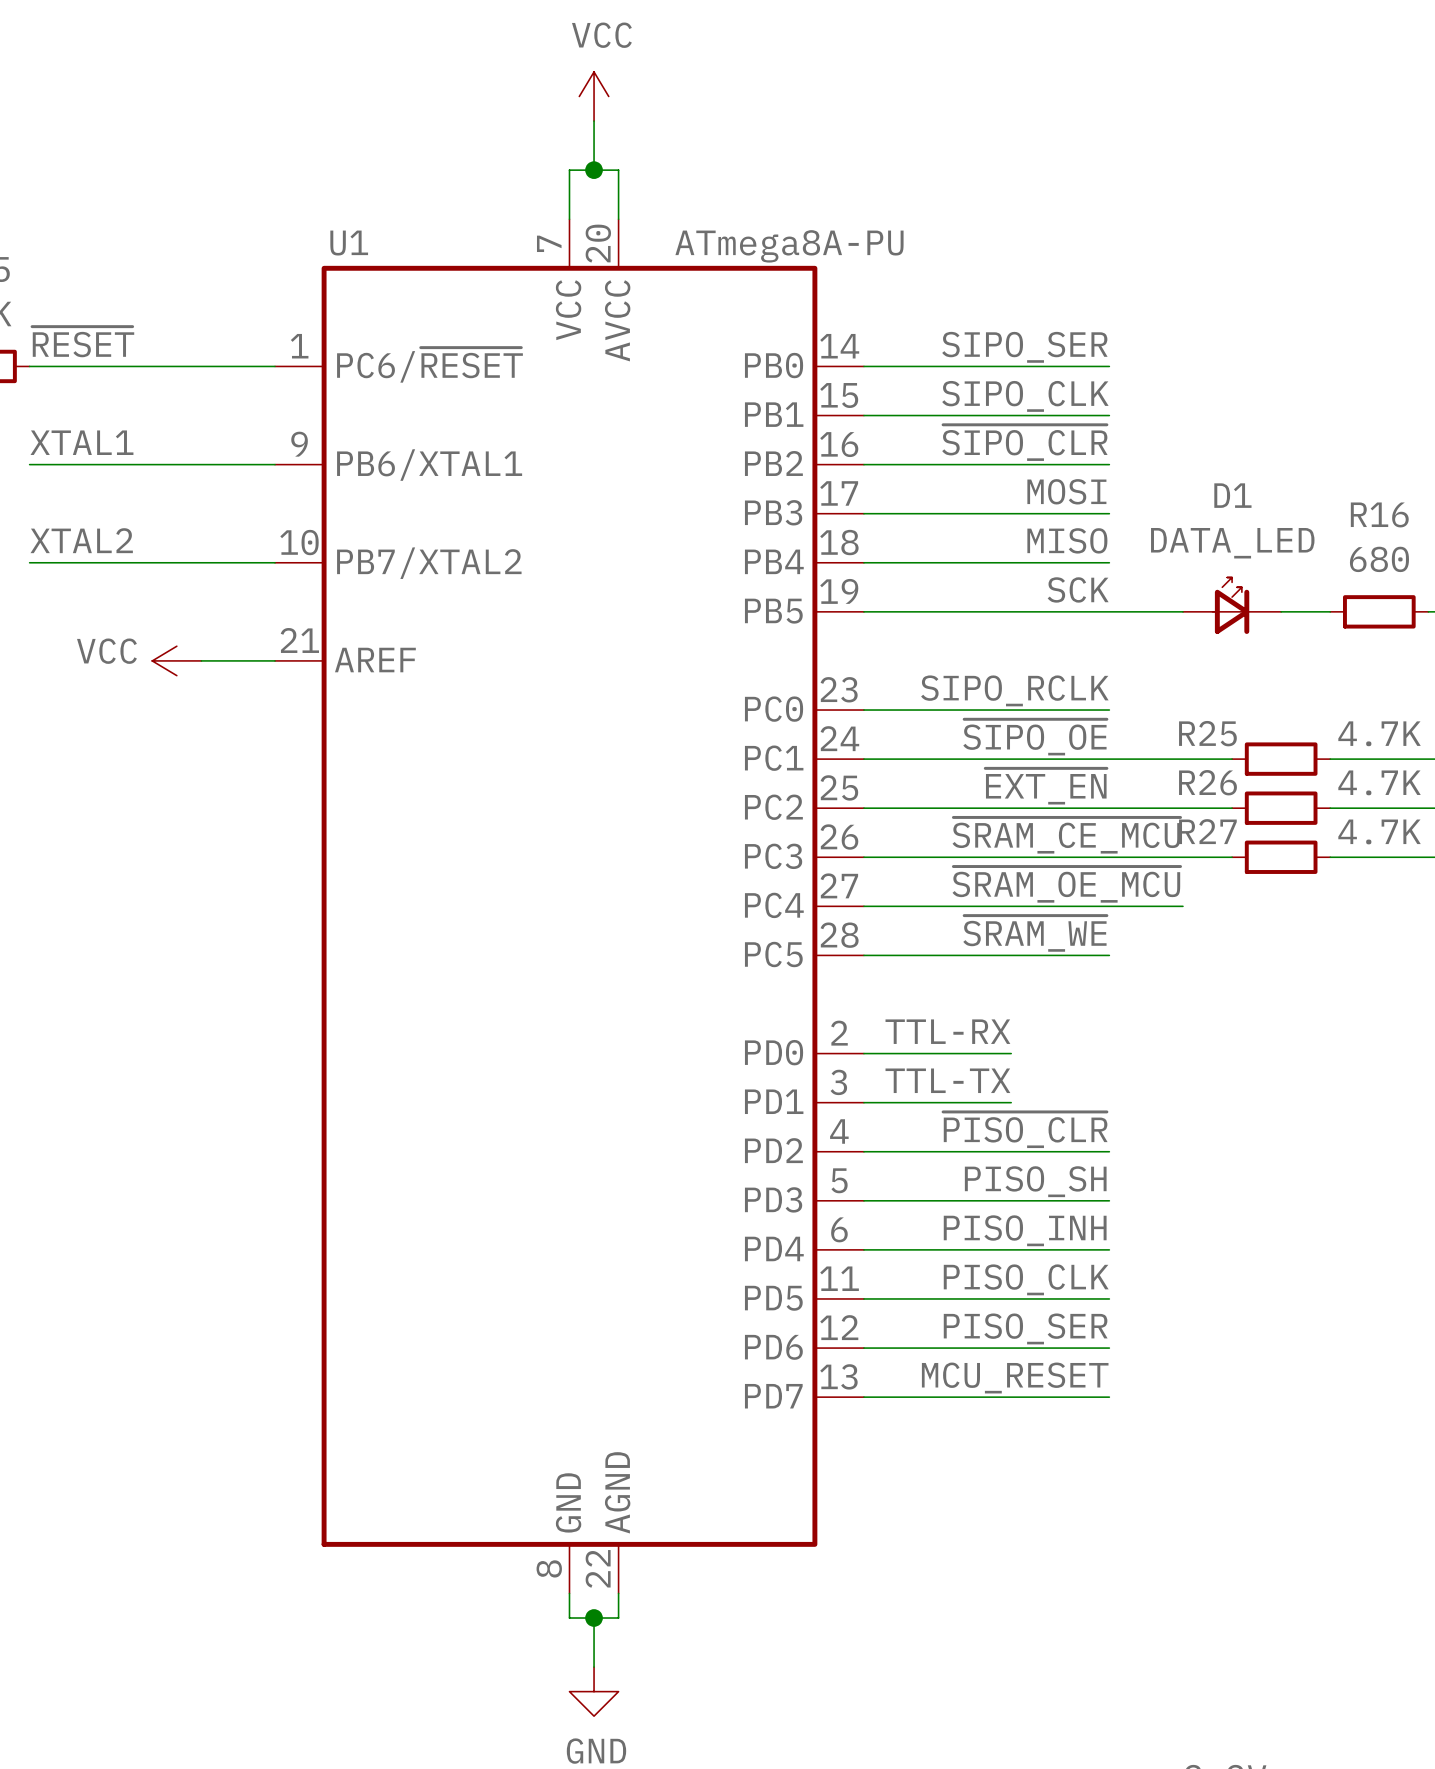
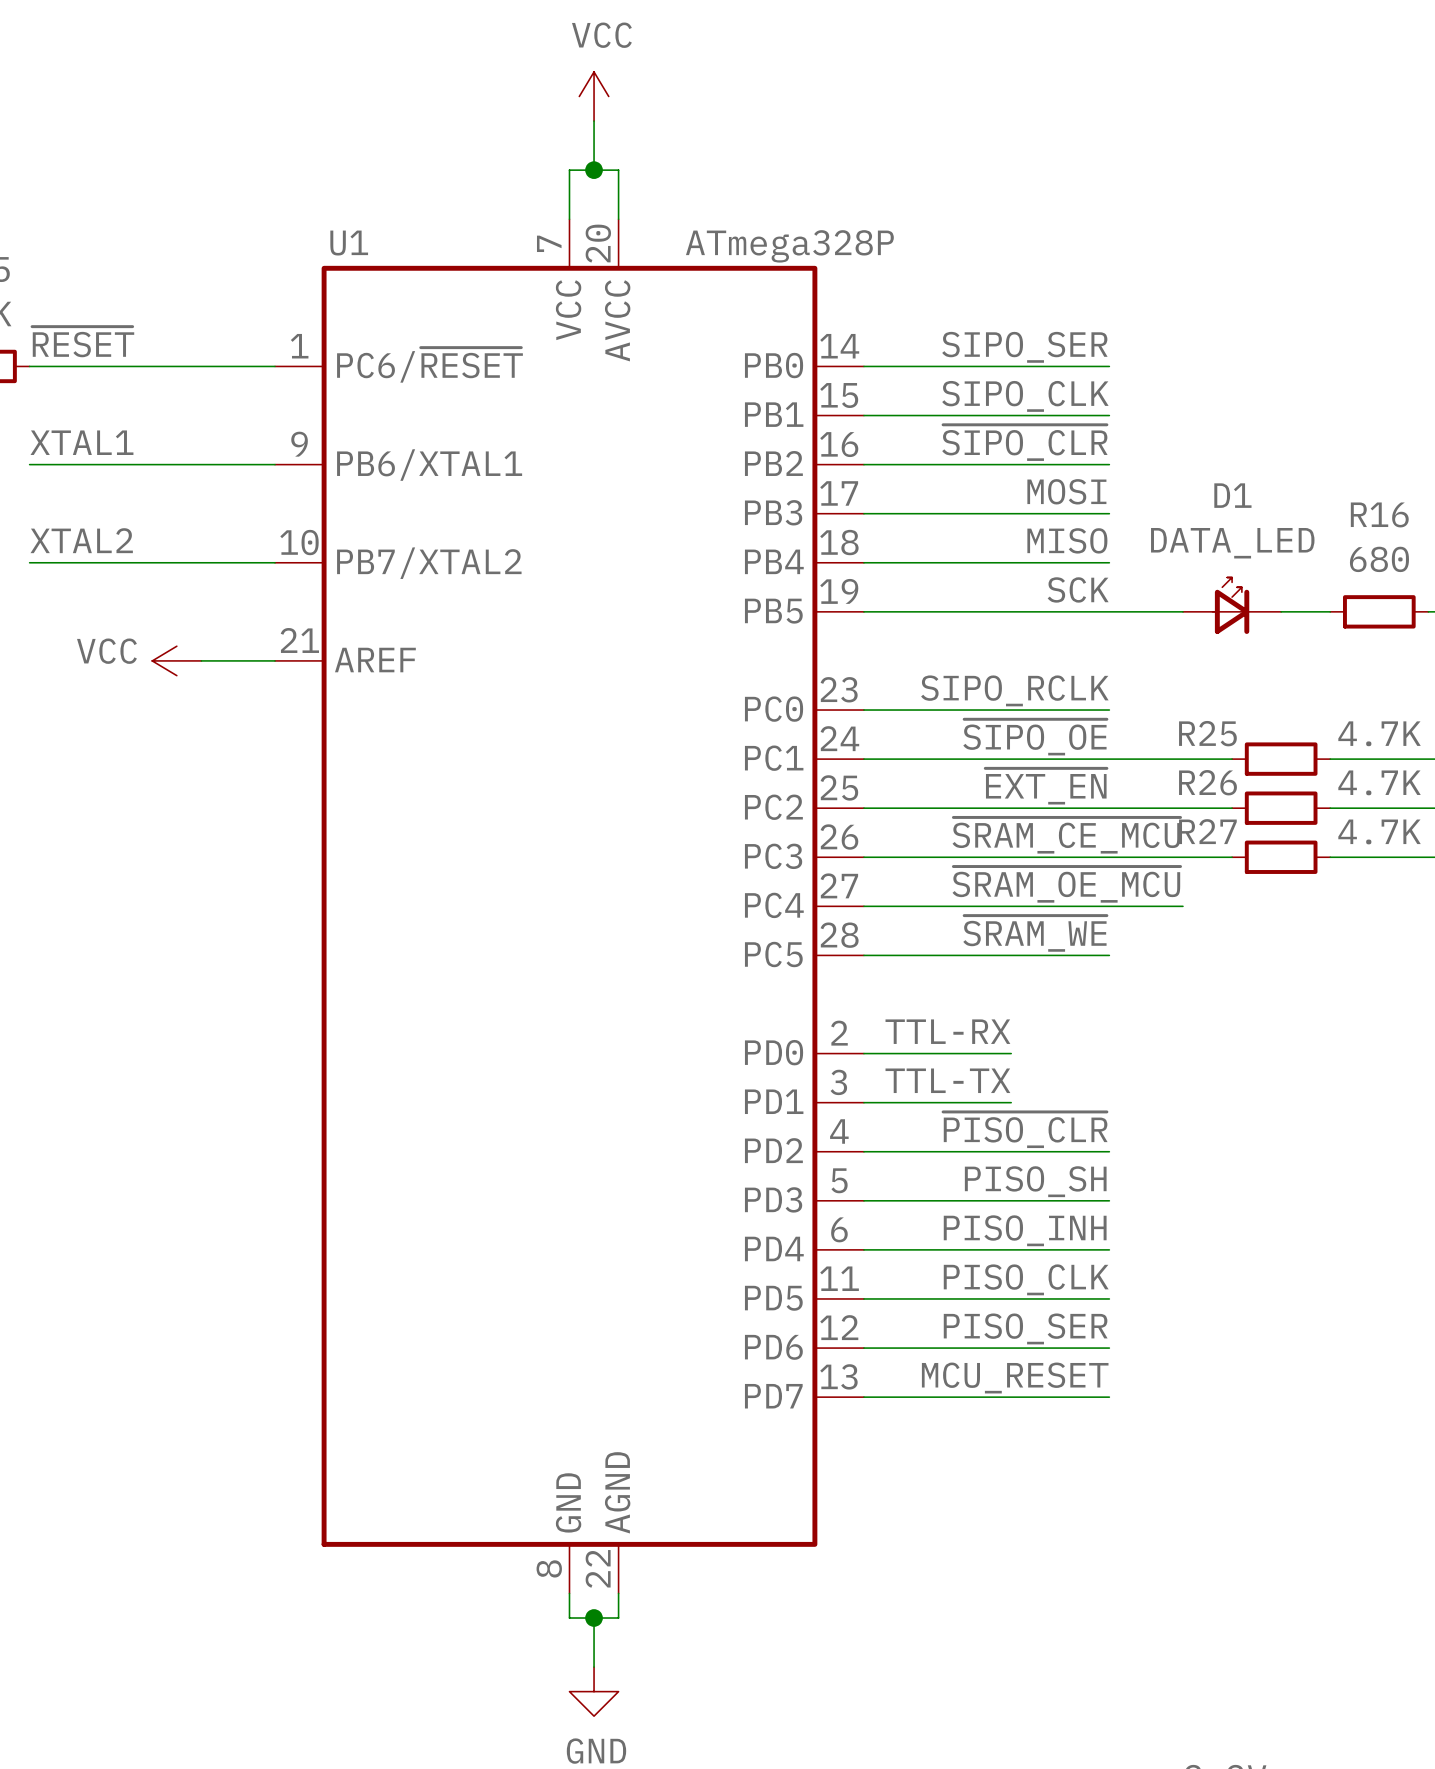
U1 value: ATmega8A-PU (789, 246) -> ATmega328P (789, 246)

